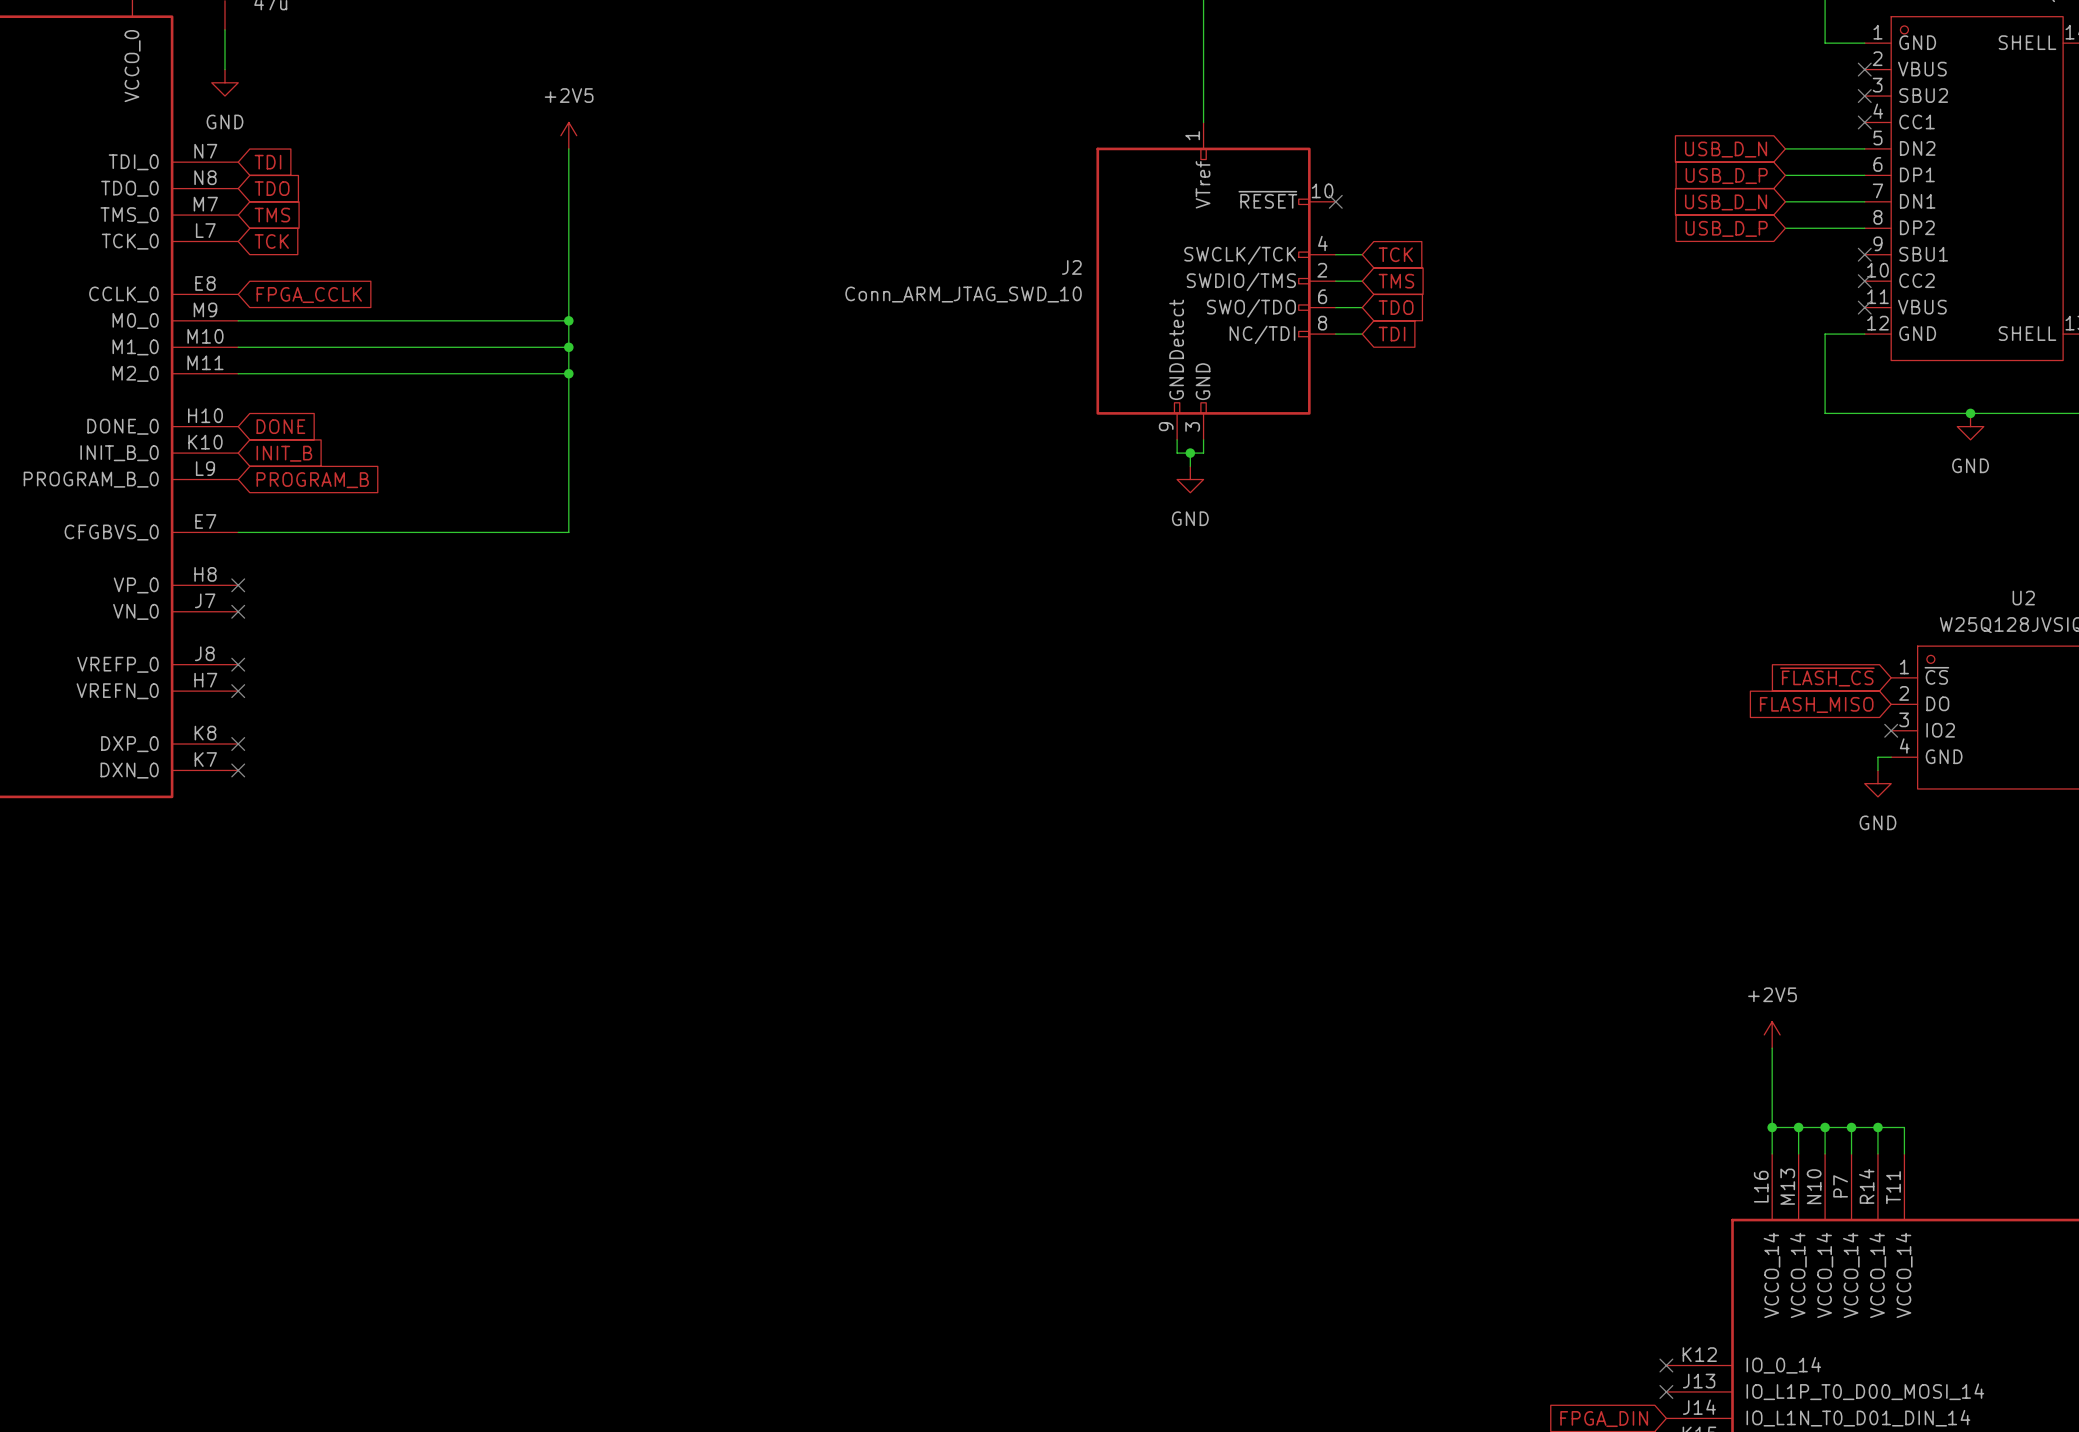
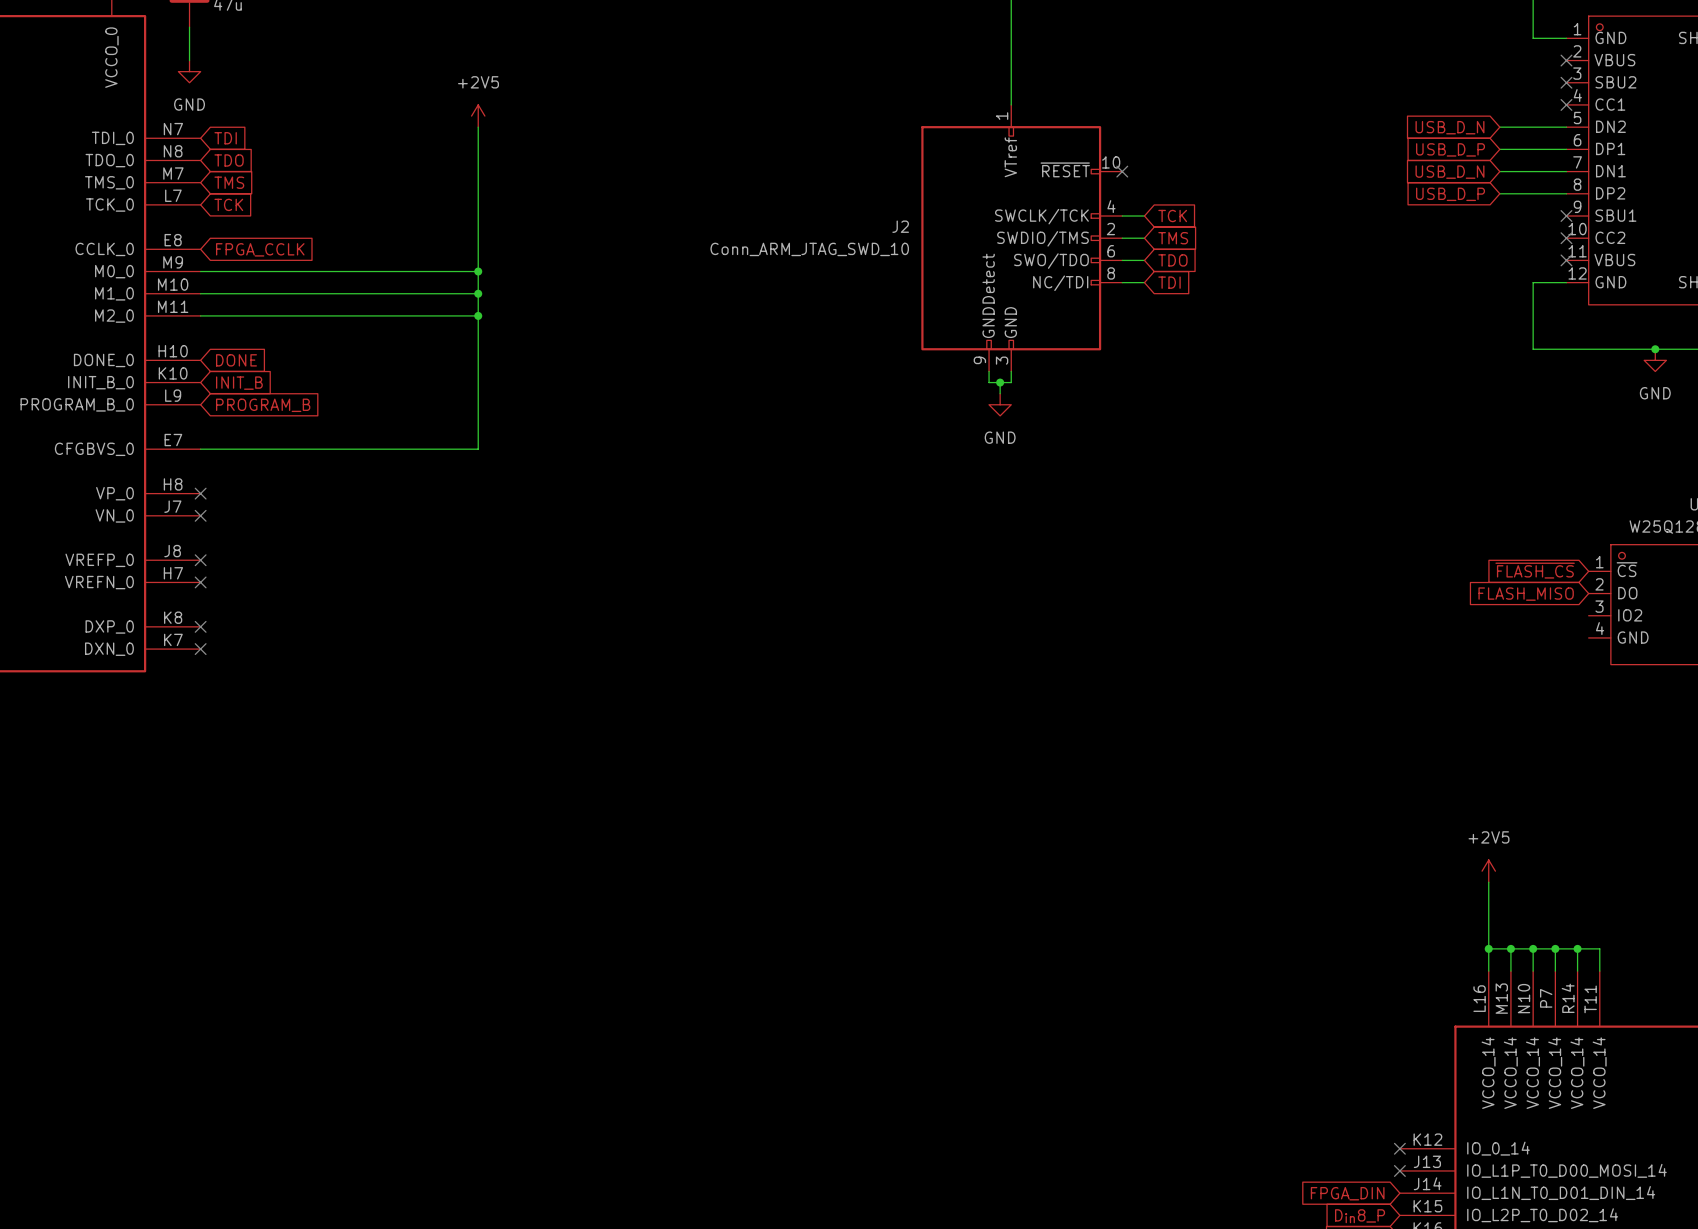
no-connect mark: (1891, 730) -> none
wire: (1891, 757) (1877, 757) (1877, 770) -> none
power symbol: GND (1877, 783) -> none

